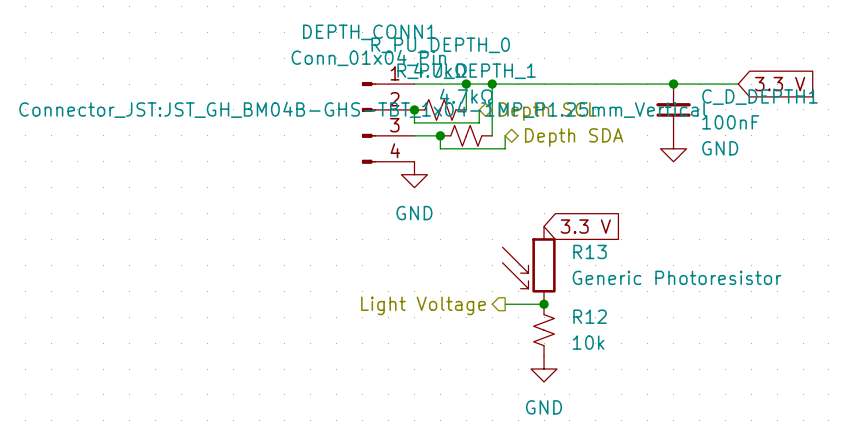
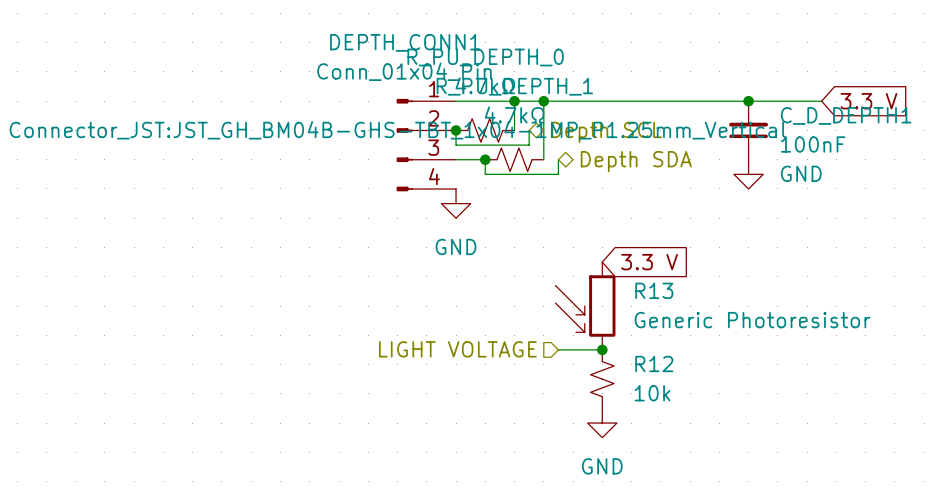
hierarchical label shape: output (423, 305) -> input (457, 349)
hierarchical label: Light Voltage (423, 305) -> LIGHT VOLTAGE (457, 349)

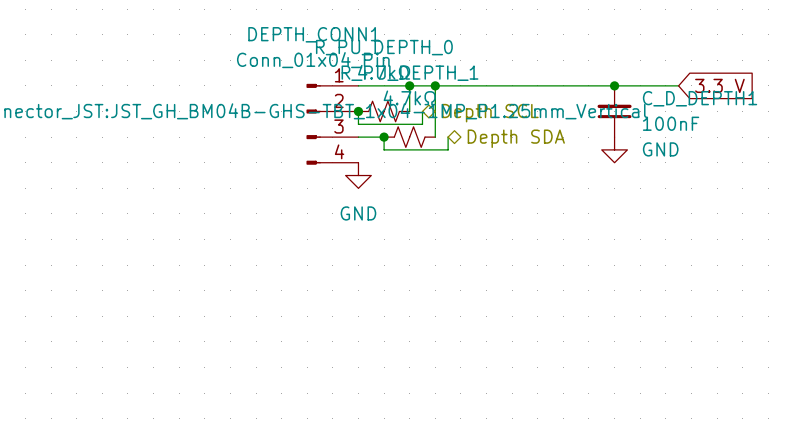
global label: 3.3 V (649, 262) -> none
R13: Generic Photoresistor (585, 306) -> none
hierarchical label: LIGHT VOLTAGE (457, 349) -> none
wire: (558, 349) (602, 349) -> none
junction: (602, 349) -> none
R12: 10k (602, 379) -> none
power symbol: GND (602, 423) -> none

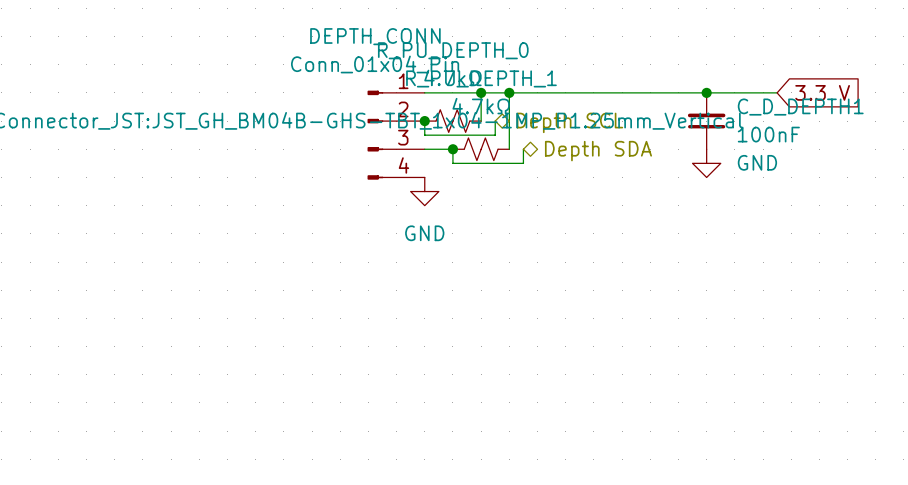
DEPTH_CONN1 name: DEPTH_CONN1 (313, 34) -> DEPTH_CONN (375, 36)

